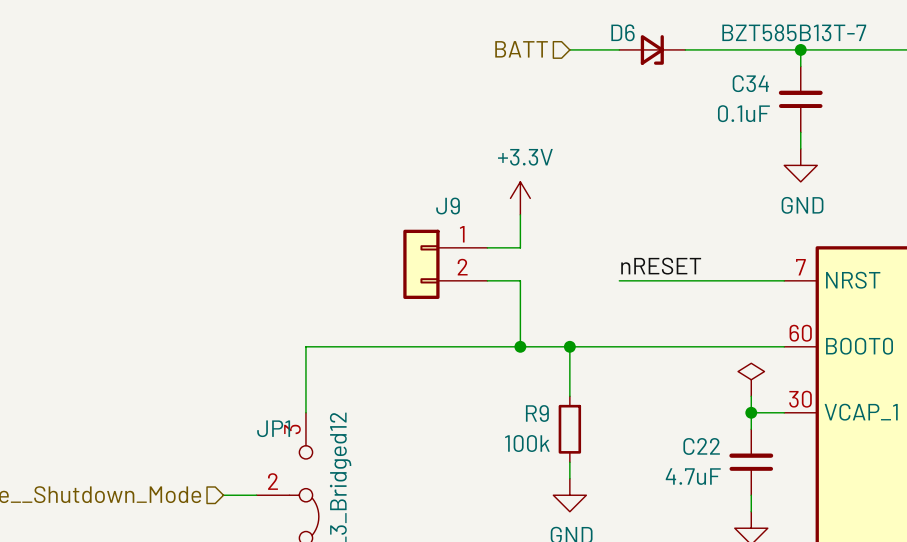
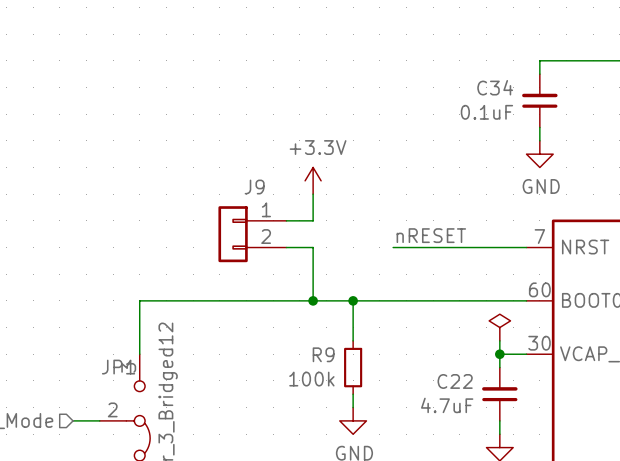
hierarchical label: BATT (521, 49) -> none
wire: (569, 49) (619, 49) -> none
D6: BZT585B13T-7 (652, 49) -> none
wire: (685, 49) (800, 49) -> none
junction: (800, 49) -> none

